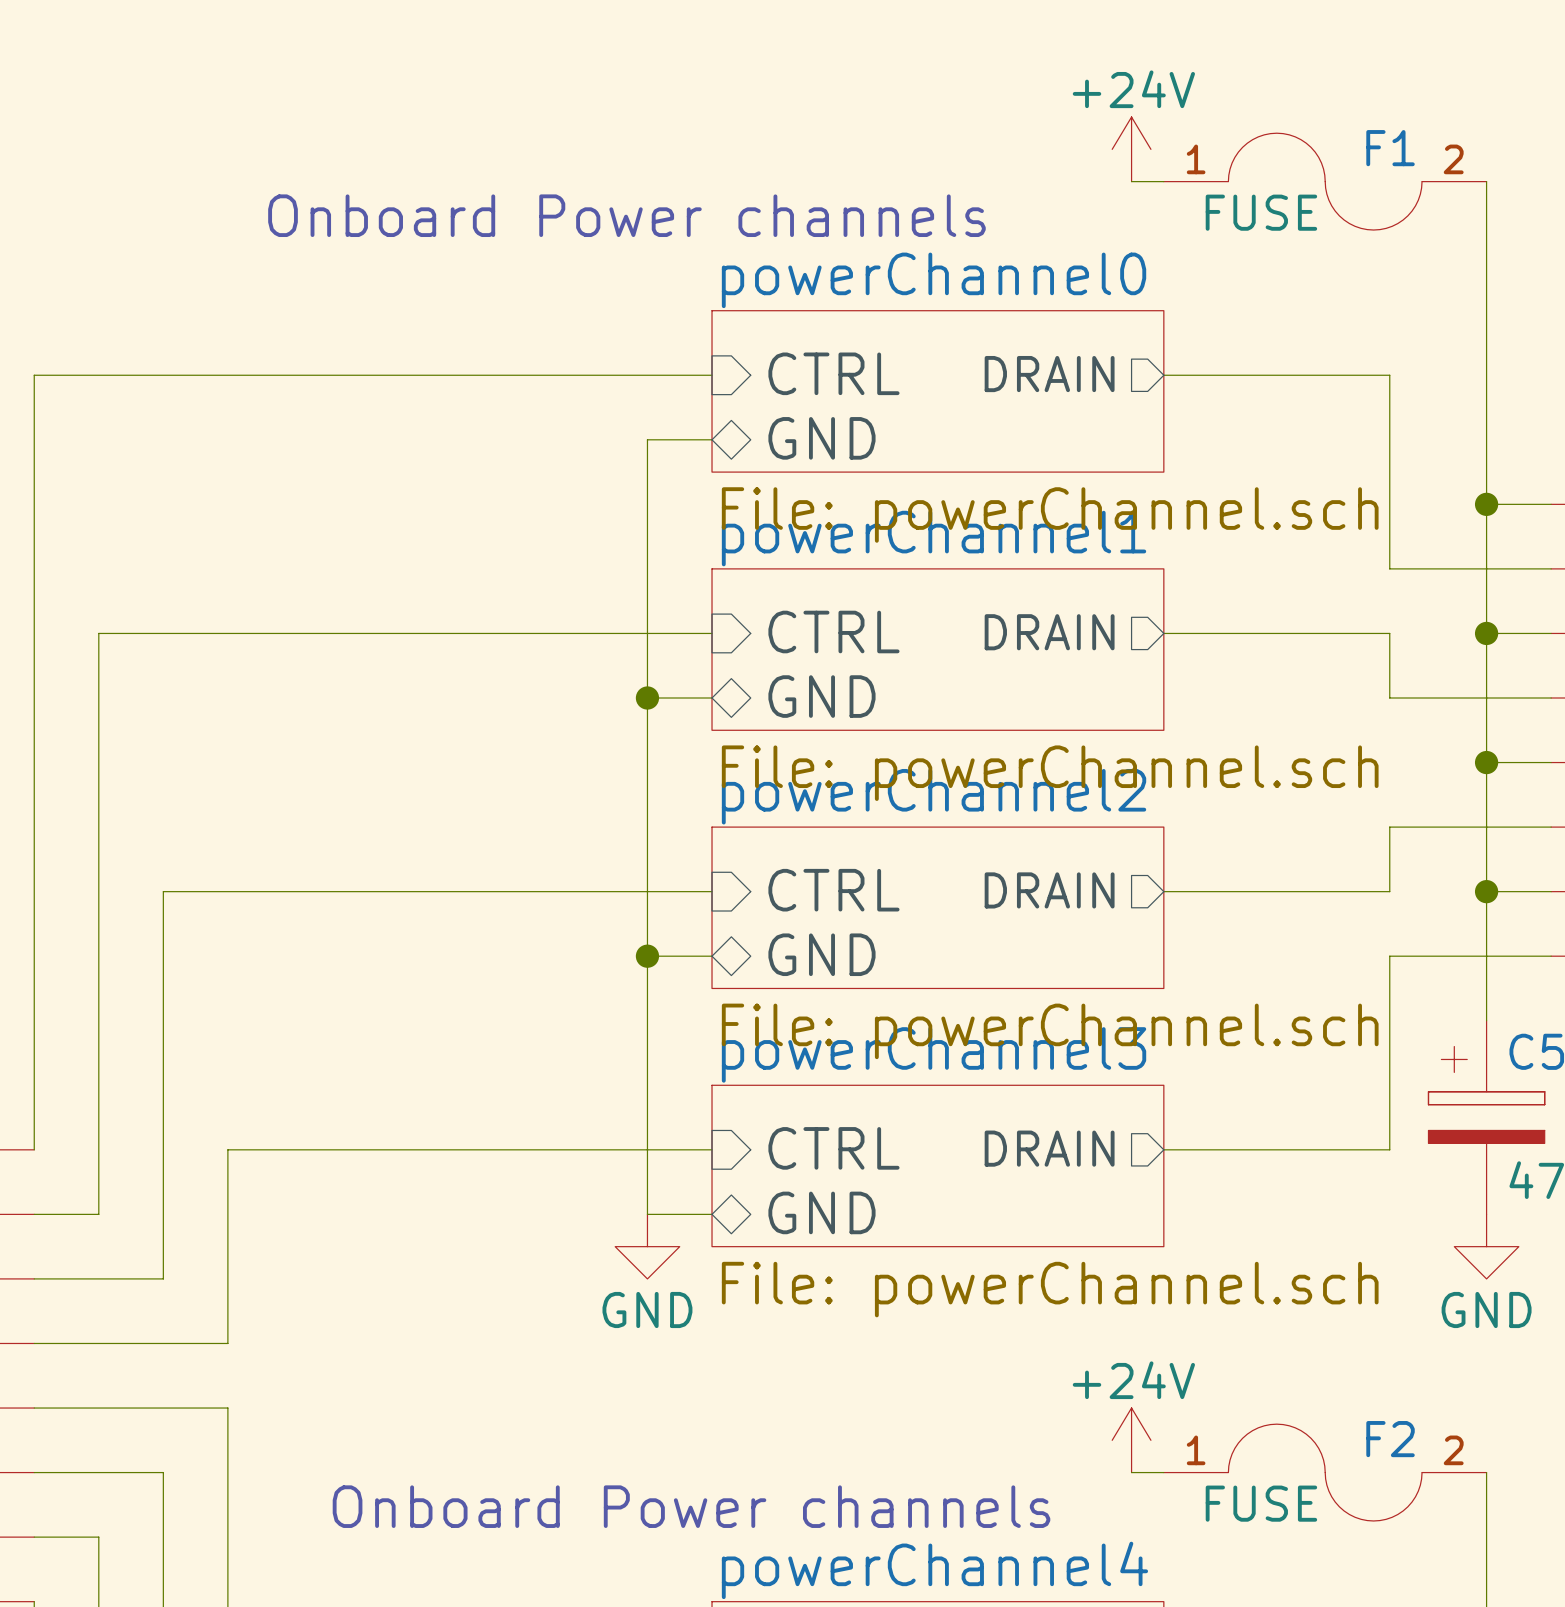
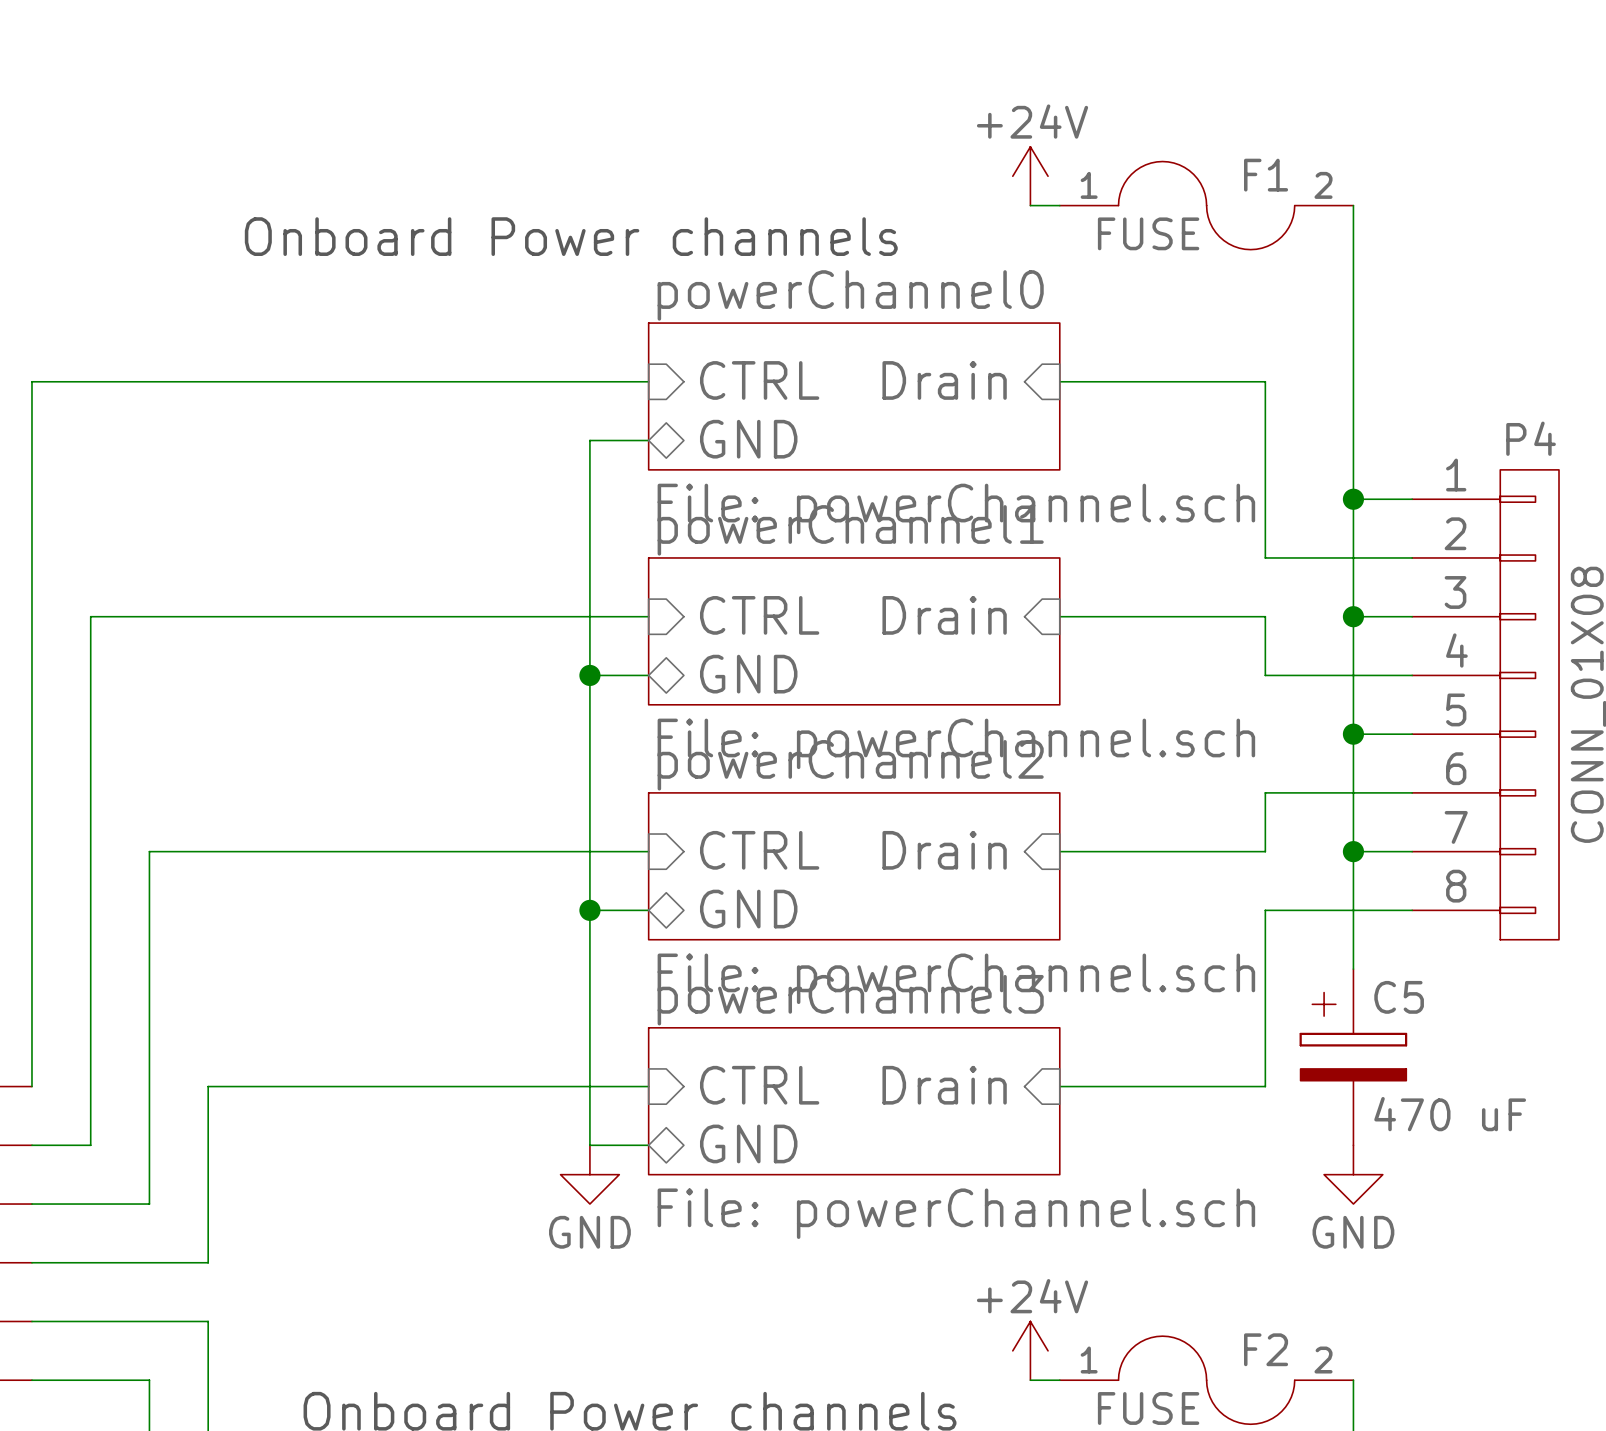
sheet pin shape: output (1049, 374) -> input (944, 380)
sheet pin: DRAIN (1049, 374) -> Drain (944, 380)
sheet pin shape: output (1049, 632) -> input (944, 615)
sheet pin: DRAIN (1049, 632) -> Drain (944, 615)
sheet pin shape: output (1049, 890) -> input (944, 850)
sheet pin: DRAIN (1049, 890) -> Drain (944, 850)
sheet pin shape: output (1049, 1148) -> input (944, 1085)
sheet pin: DRAIN (1049, 1148) -> Drain (944, 1085)

